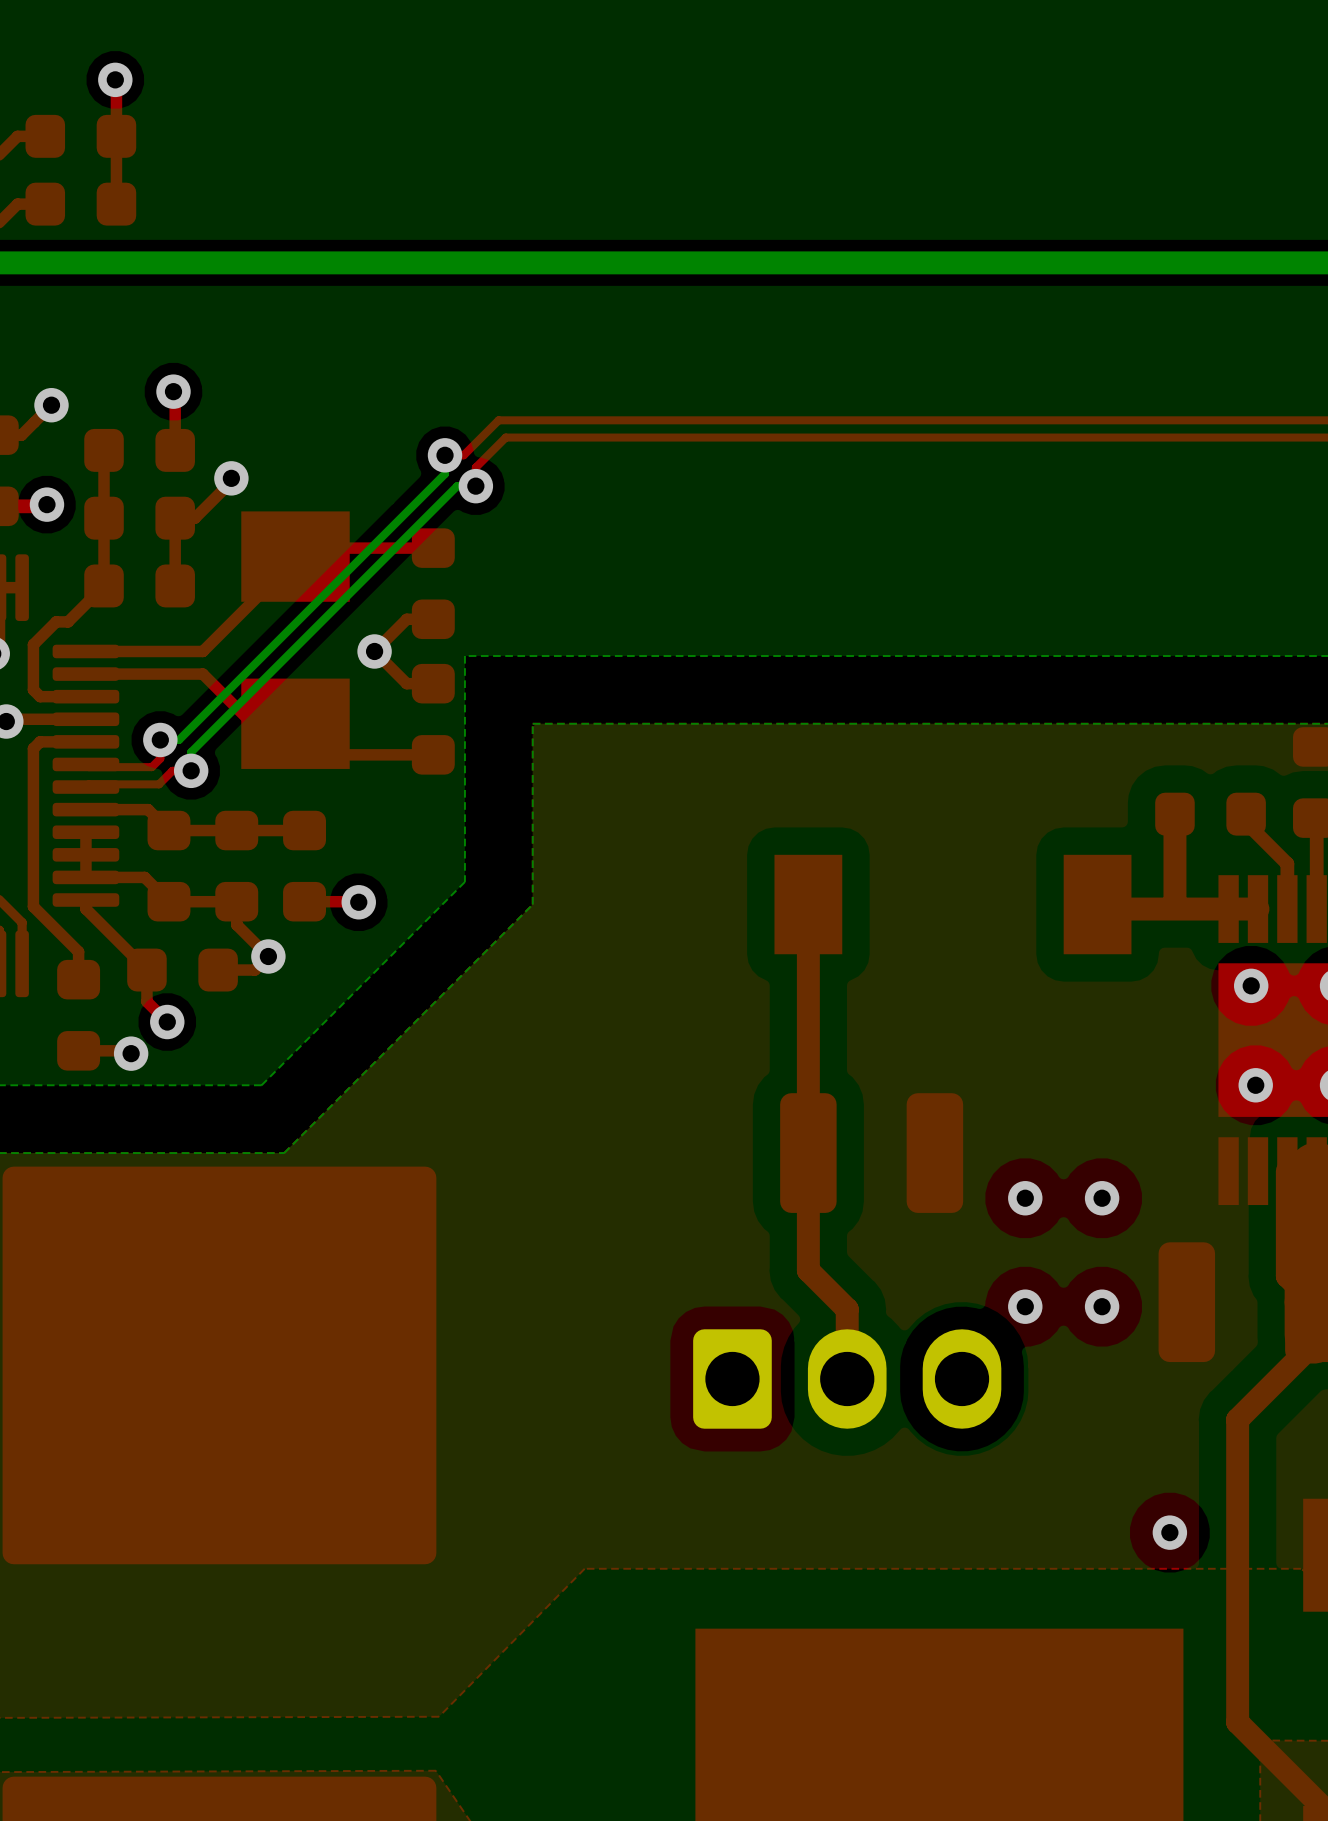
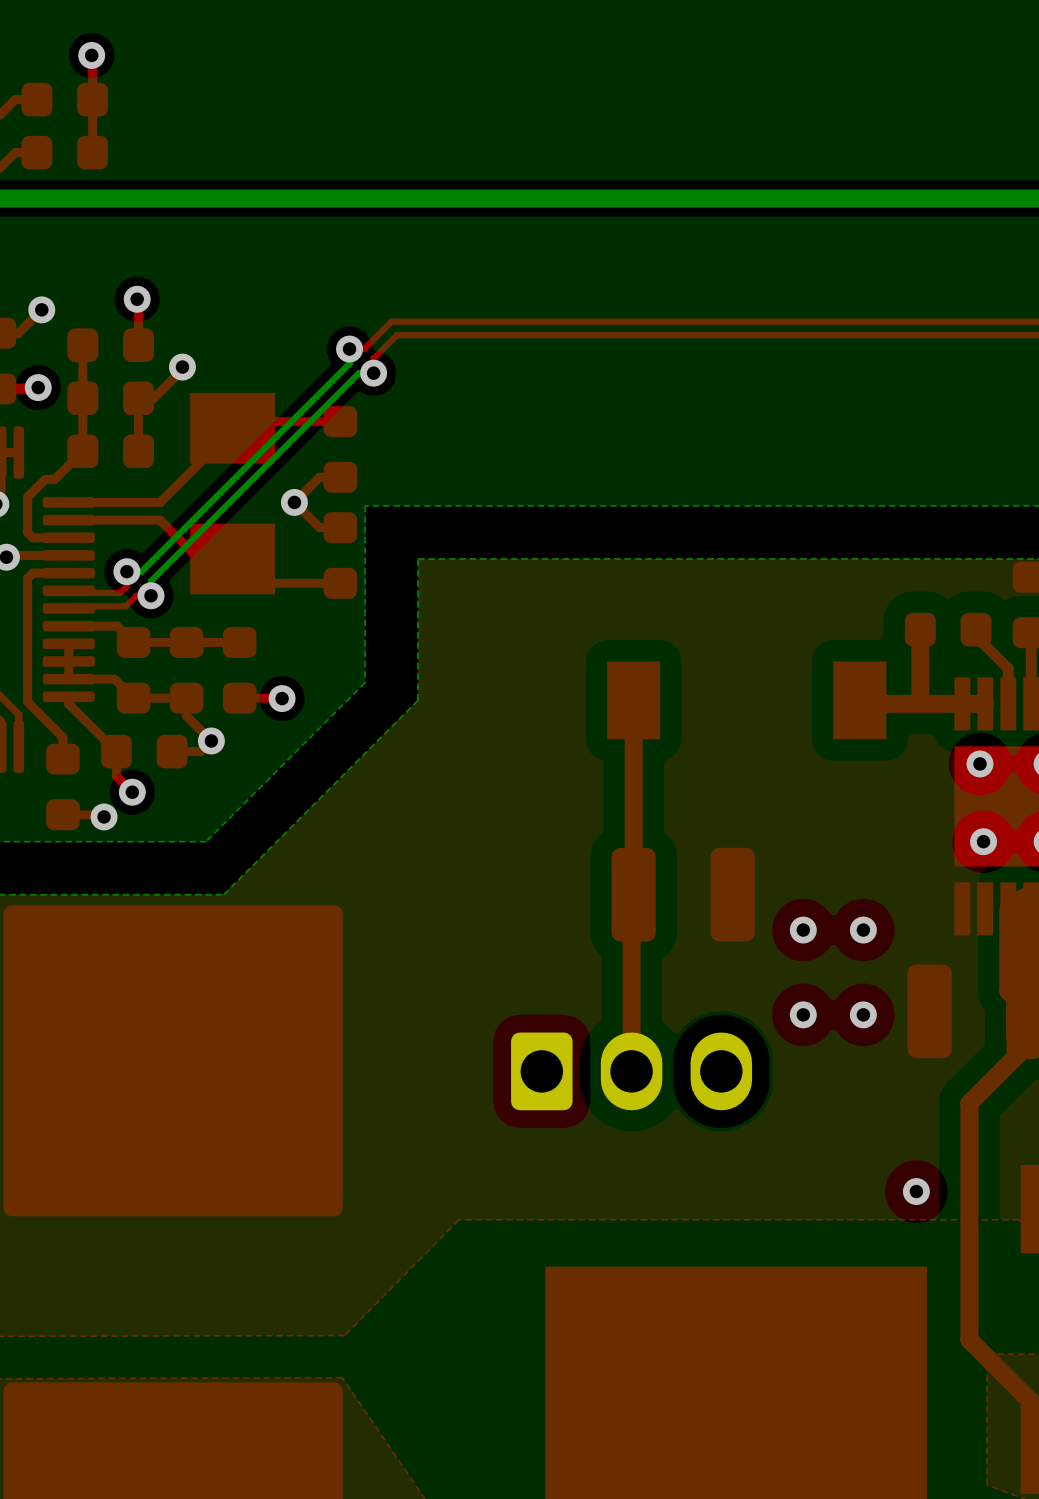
top track: (808, 1153) (808, 1270) (847, 1309) (847, 1378) -> none
top track: none -> (631, 896) (631, 1071)
part position: (847, 1378) -> (631, 1071)

